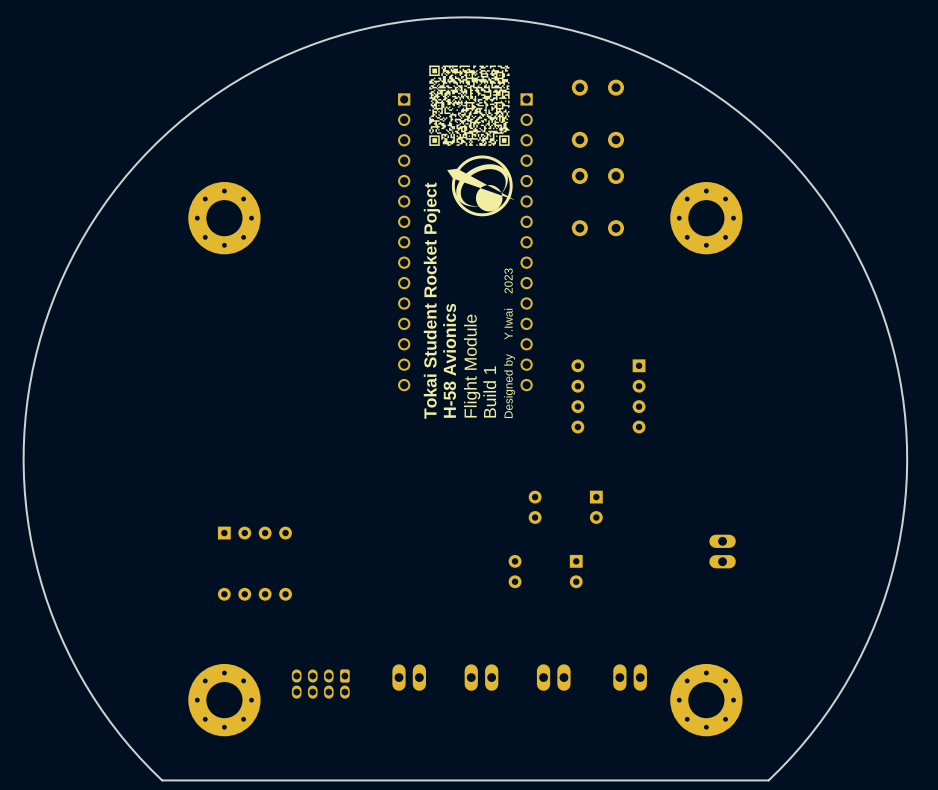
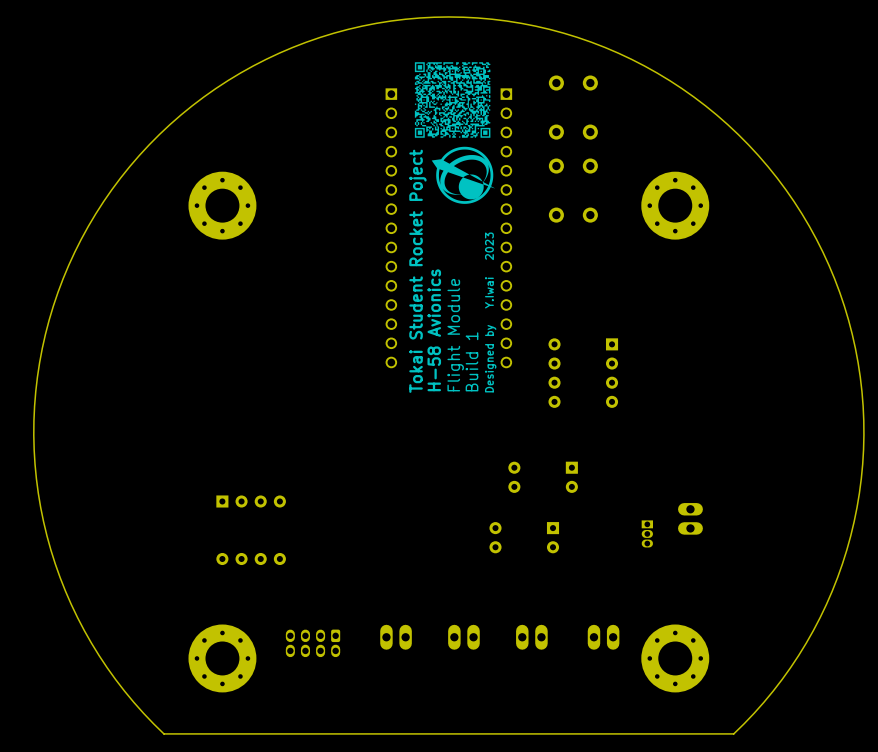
part: none -> (647, 533)

